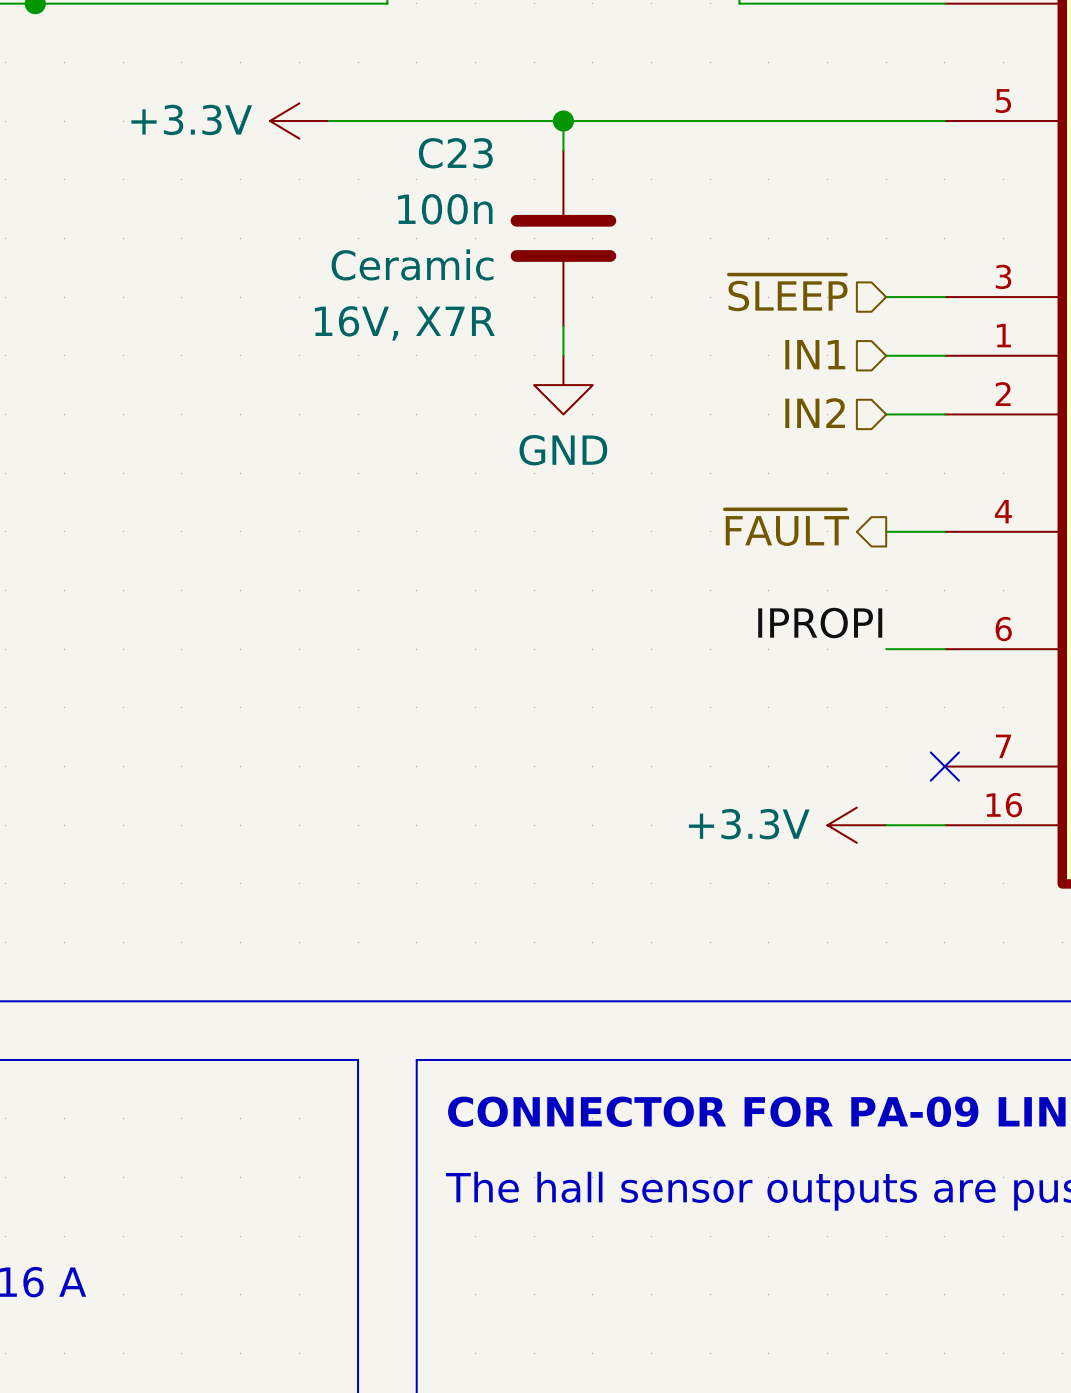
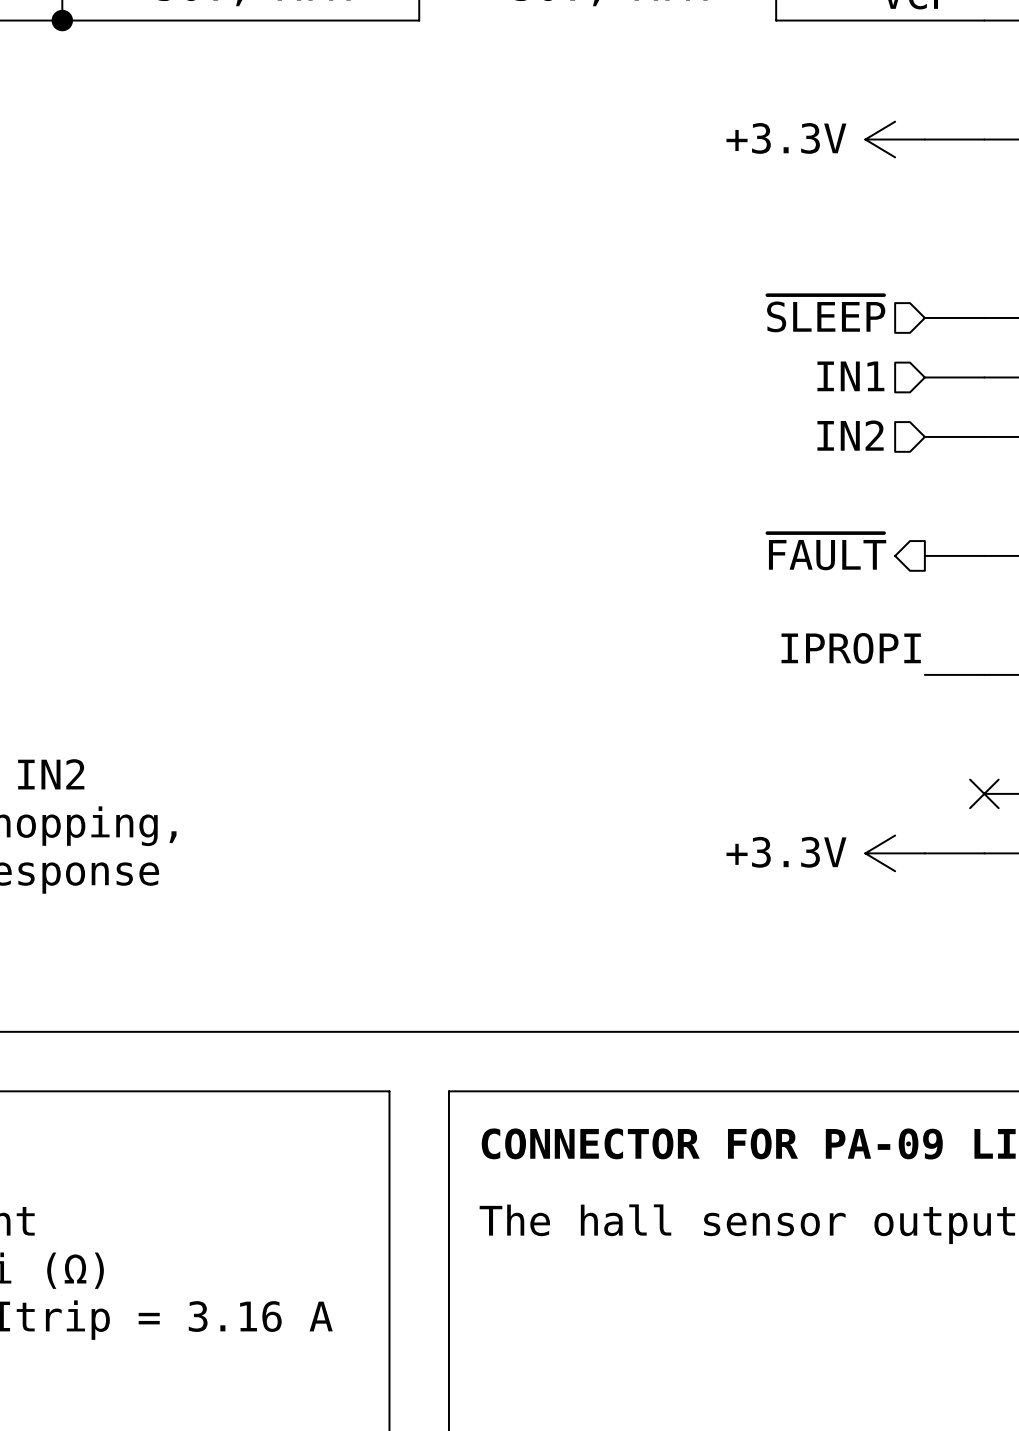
power symbol position: +3.3V (299, 121) -> +3.3V (895, 139)
wire: (328, 121) (886, 121) -> none
wire: (563, 121) (563, 150) -> none
junction: (563, 121) -> none
C23: 100n (563, 238) -> none
wire: (563, 326) (563, 355) -> none
power symbol: GND (563, 385) -> none

